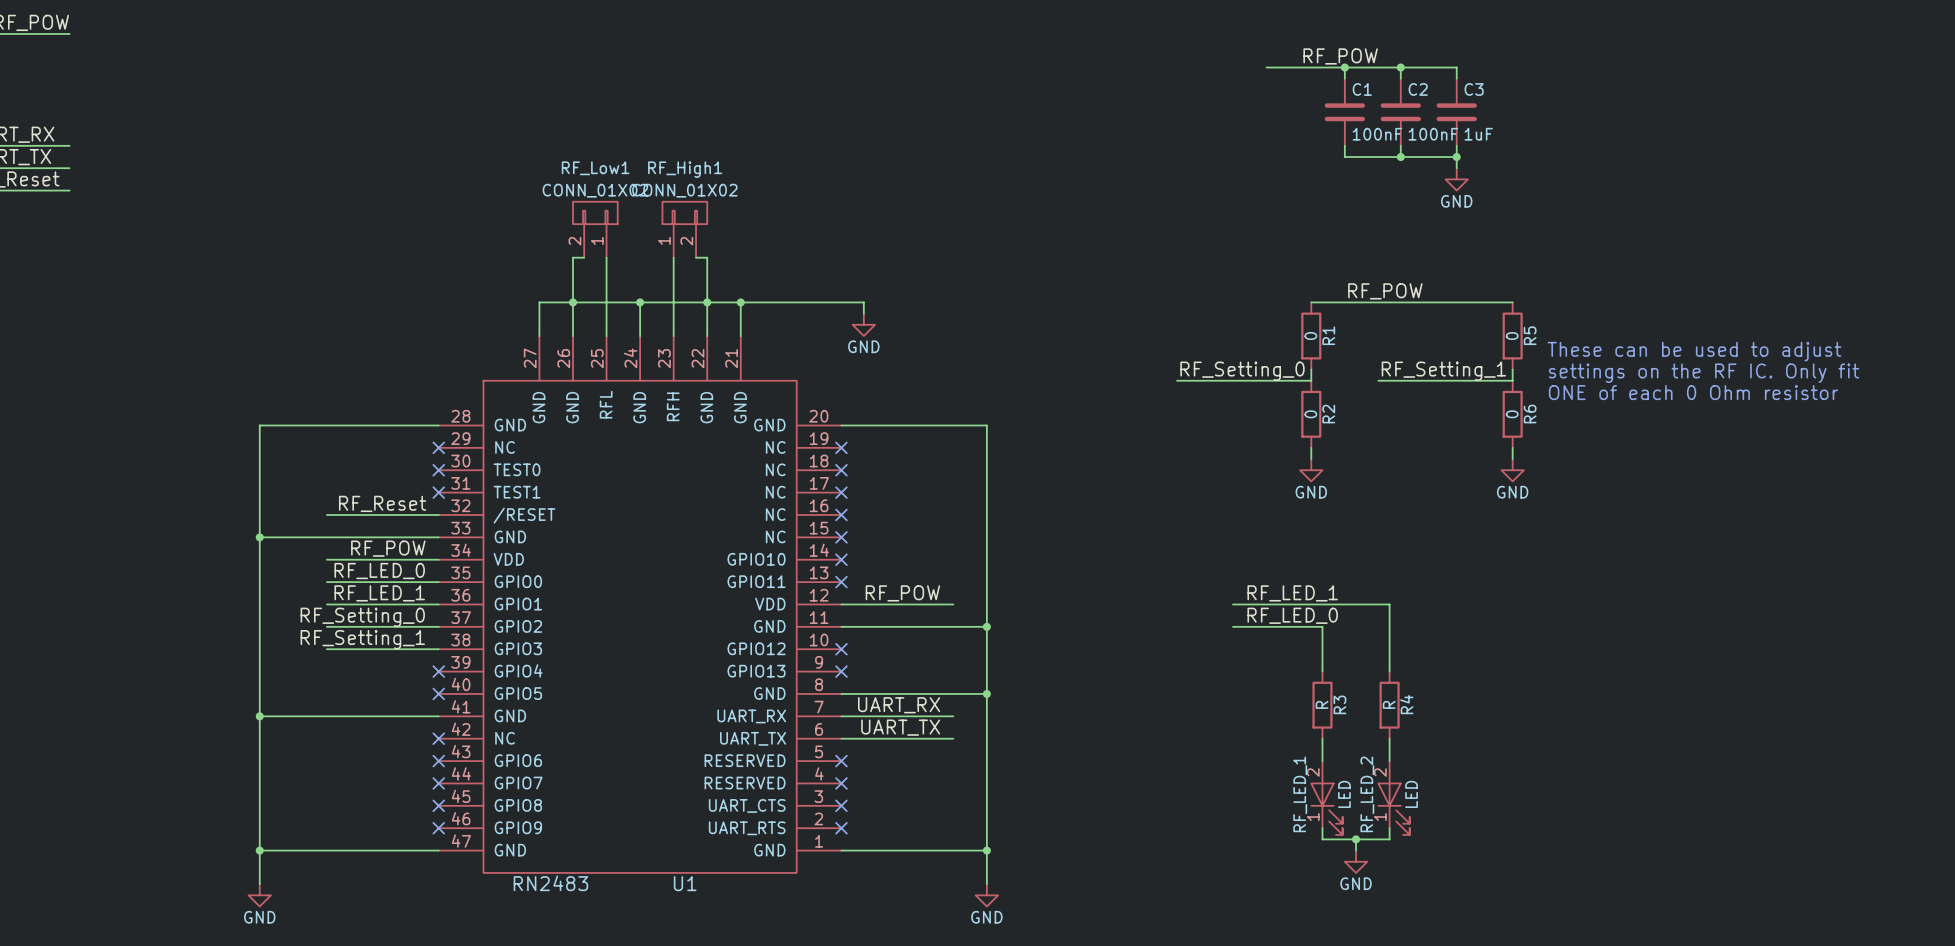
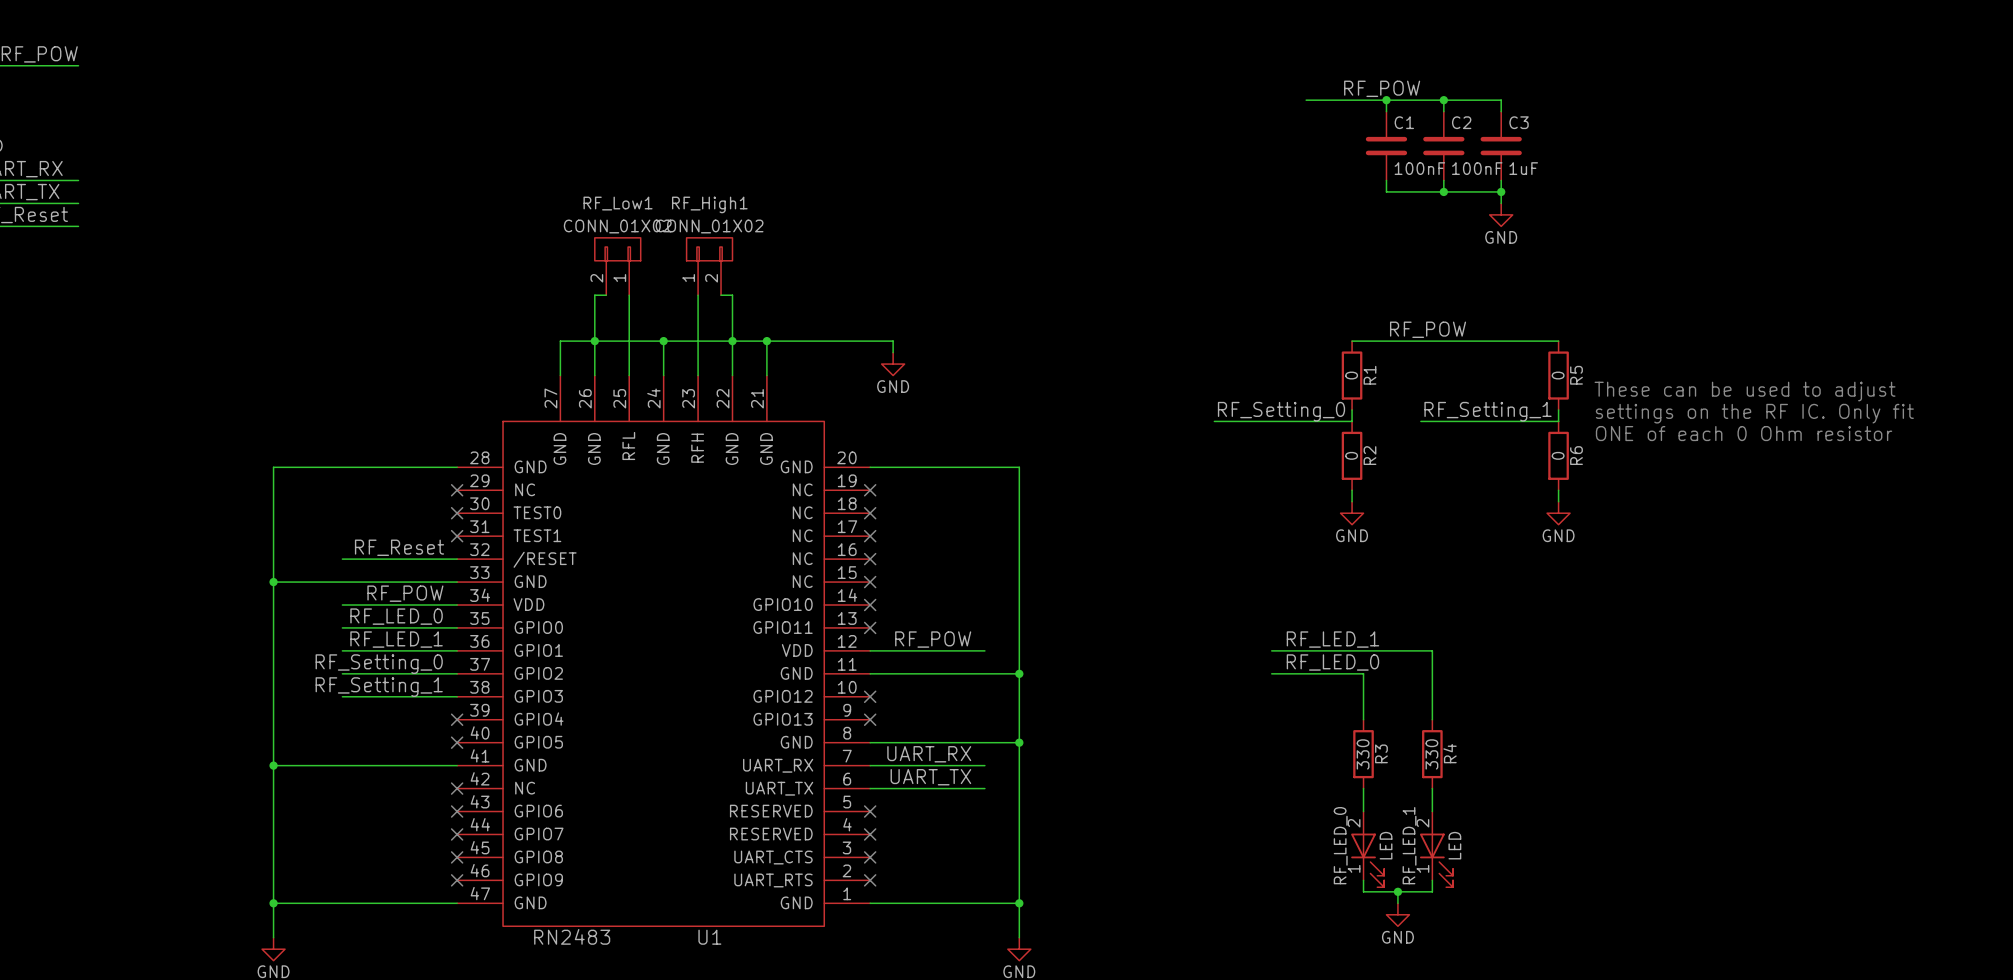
R3 value: R (1322, 704) -> 330 (1363, 754)
R4 value: R (1389, 704) -> 330 (1431, 754)
RF_LED_1 name: RF_LED_1 (1300, 794) -> RF_LED_0 (1340, 845)
RF_LED_2 name: RF_LED_2 (1367, 794) -> RF_LED_1 (1409, 845)

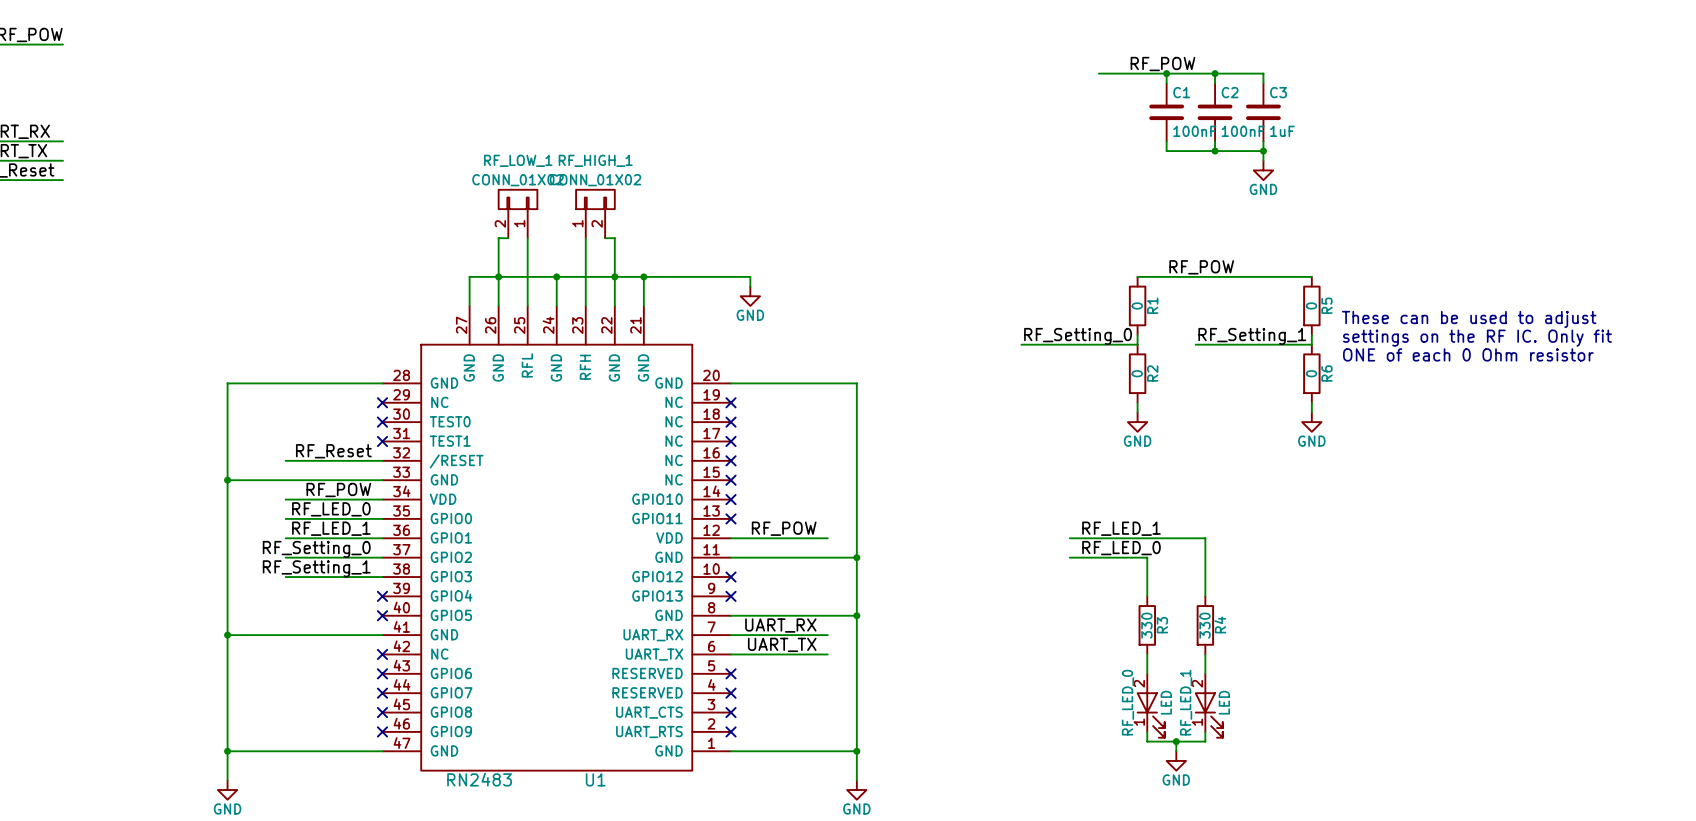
RF_Low1 name: RF_Low1 (618, 203) -> RF_LOW_1 (518, 160)
RF_High1 name: RF_High1 (709, 204) -> RF_HIGH_1 (595, 160)

